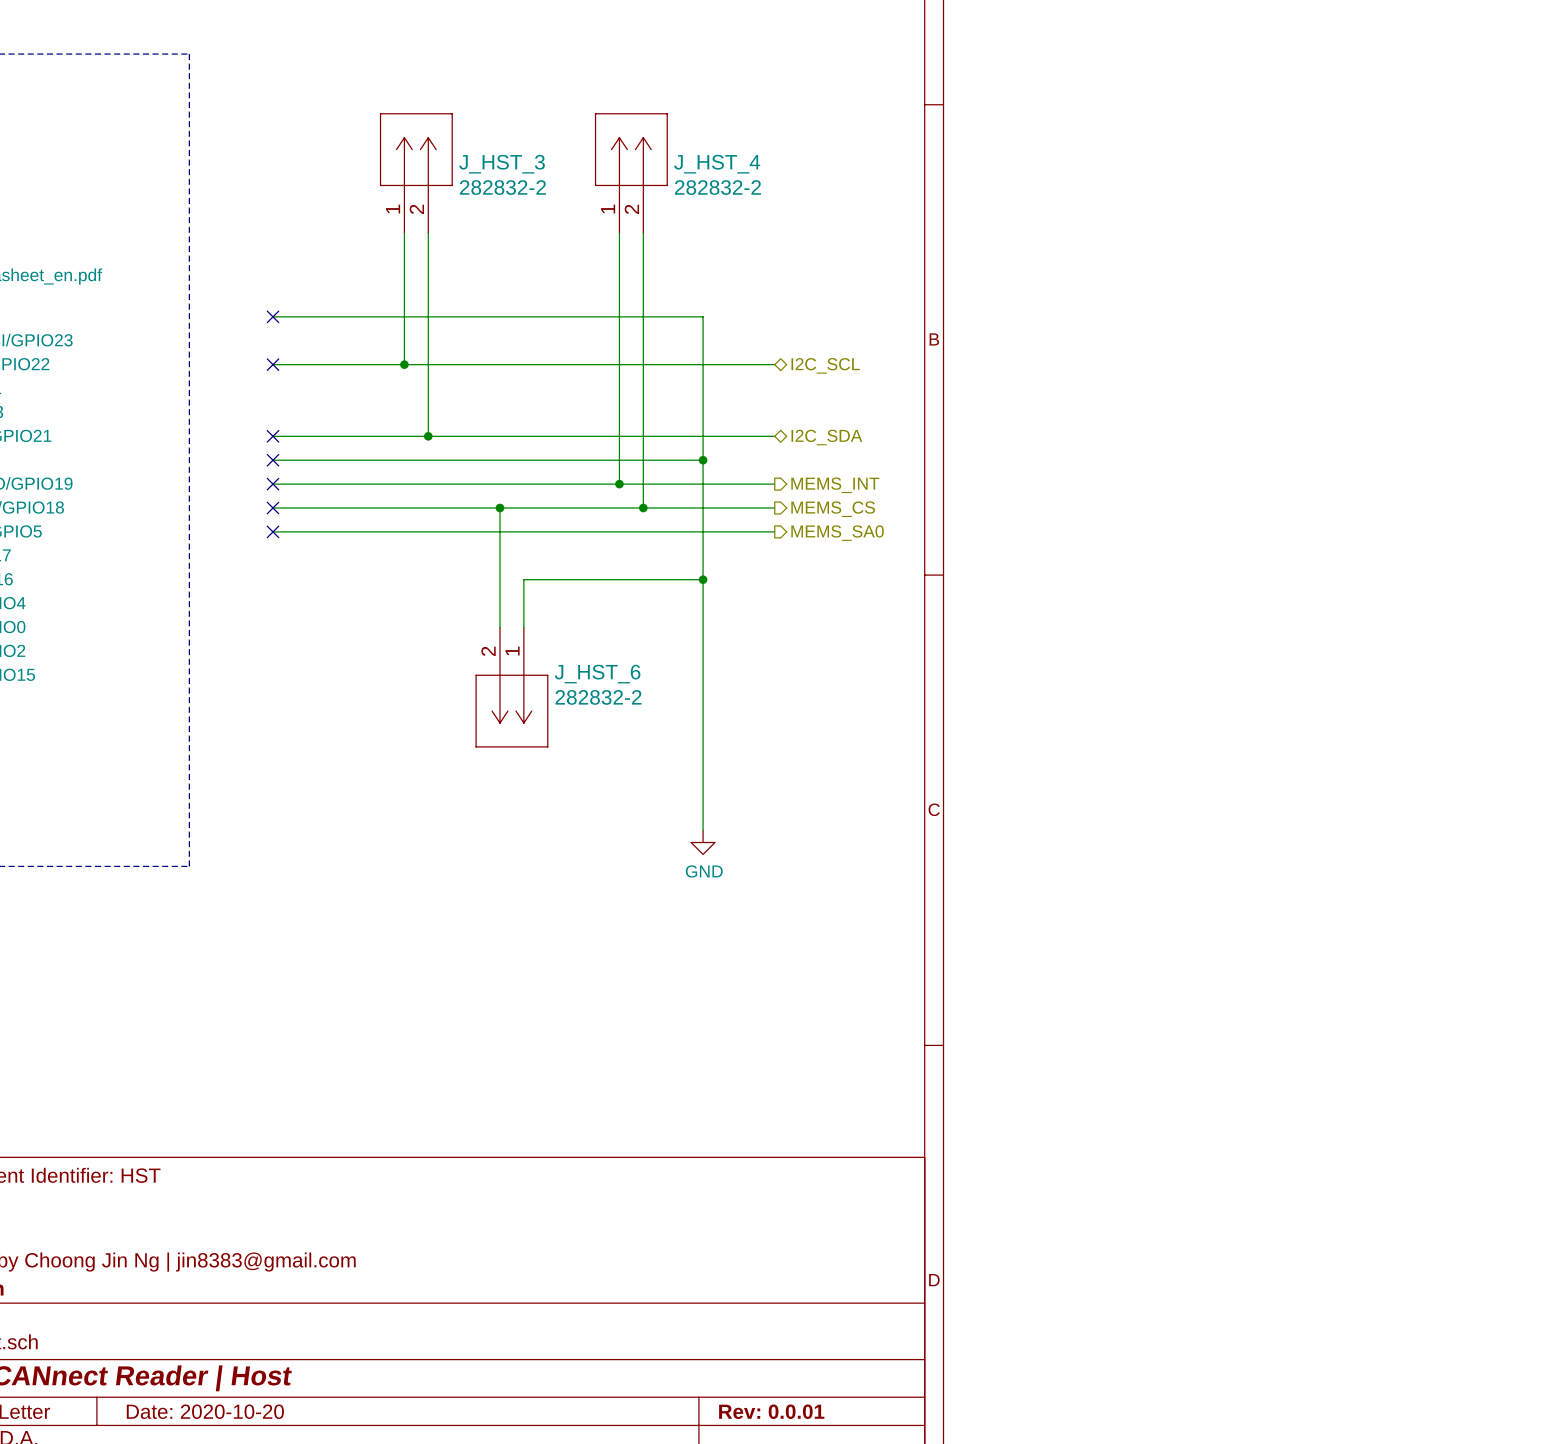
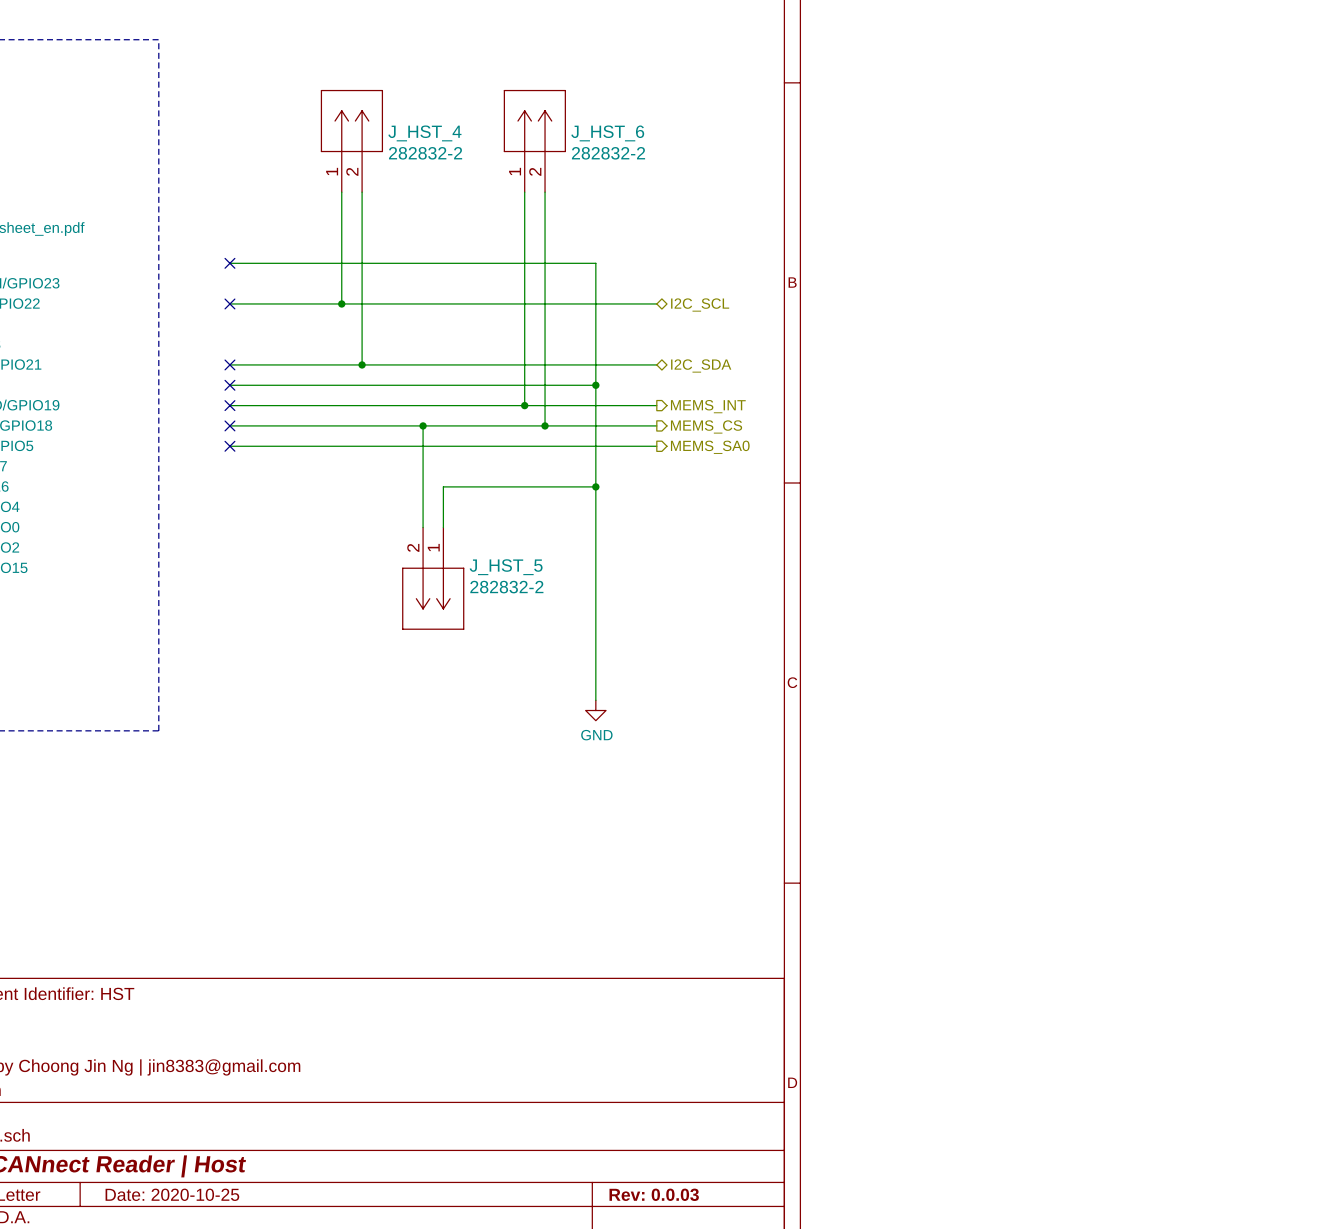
J_HST_3 name: J_HST_3 (502, 164) -> J_HST_4 (424, 133)
J_HST_4 name: J_HST_4 (717, 164) -> J_HST_6 (607, 133)
J_HST_6 name: J_HST_6 (597, 674) -> J_HST_5 (506, 567)
title block: Date: 2020-10-20 (205, 1411) -> Date: 2020-10-25 (172, 1194)
title block: Rev: 0.0.01 (771, 1411) -> Rev: 0.0.03 (654, 1194)

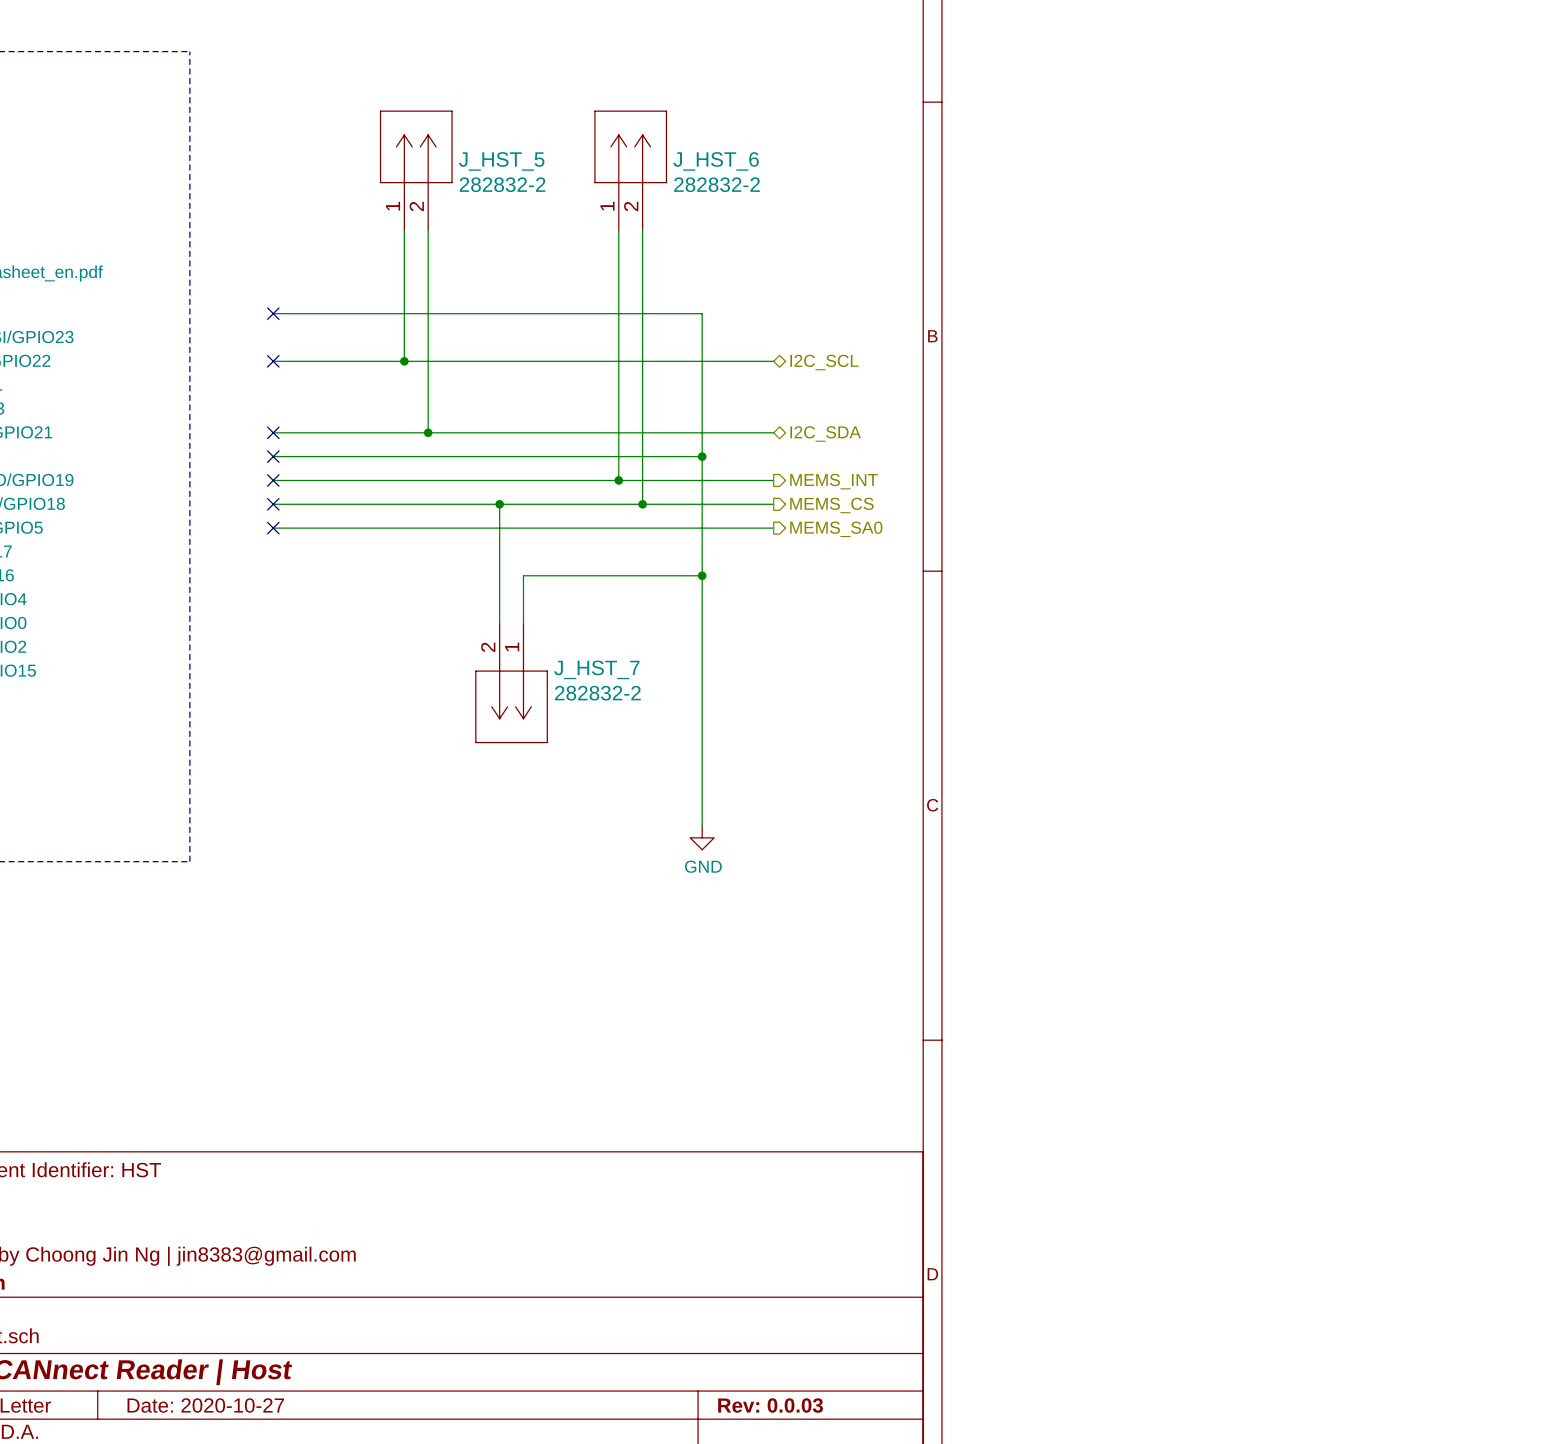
J_HST_4 name: J_HST_4 (424, 133) -> J_HST_5 (501, 161)
J_HST_5 name: J_HST_5 (506, 567) -> J_HST_7 (596, 669)
title block: Date: 2020-10-25 (172, 1194) -> Date: 2020-10-27 (205, 1405)

